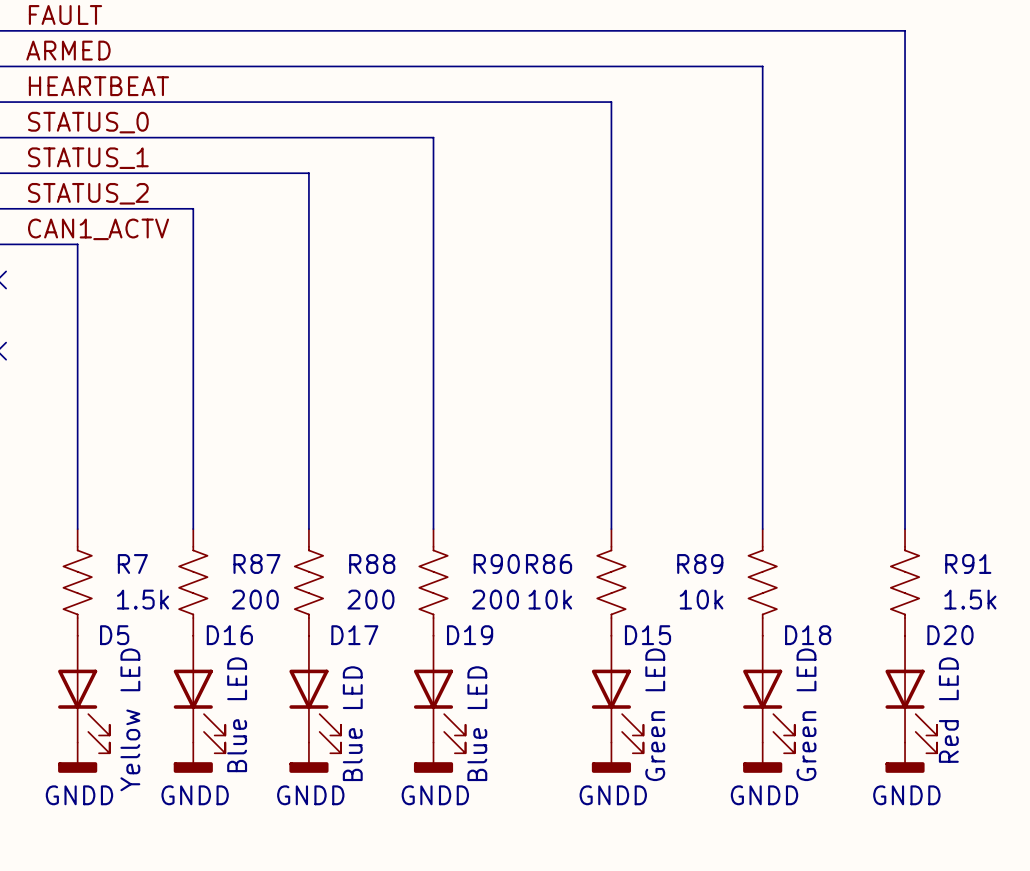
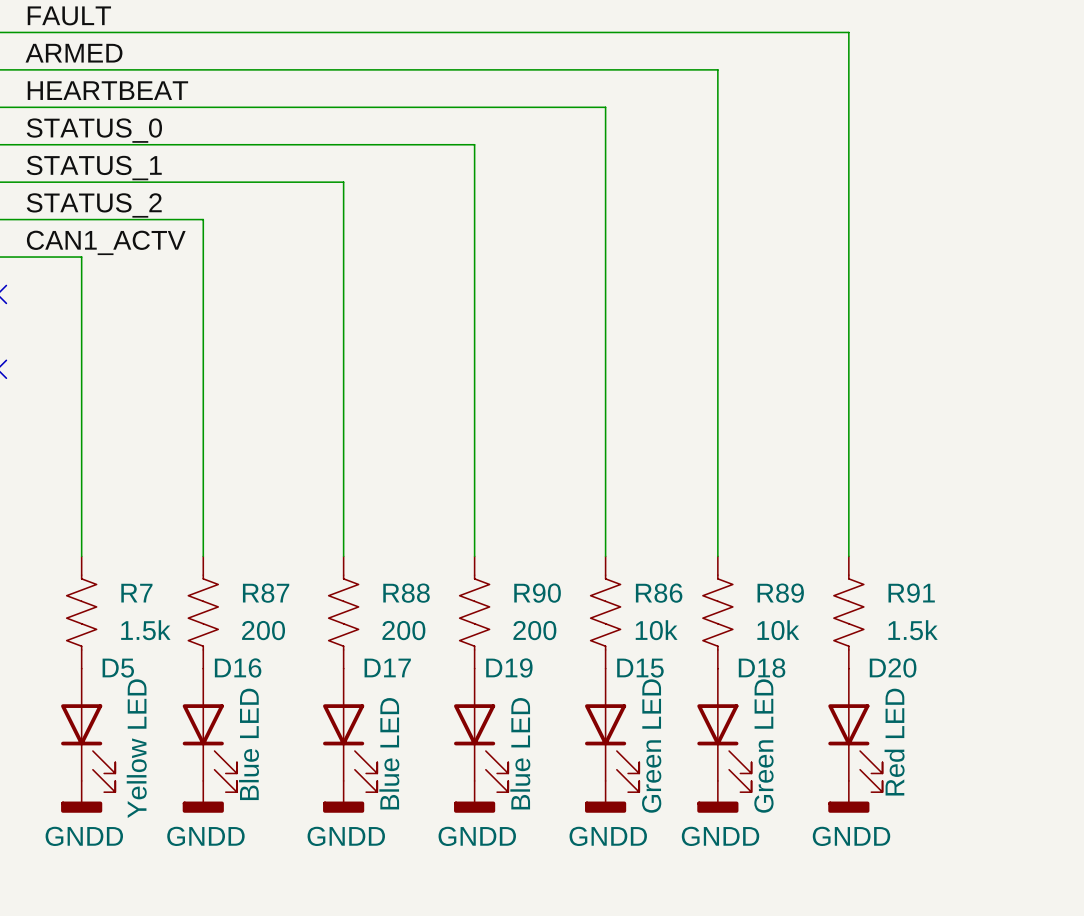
wire: (807, 30) (905, 30) (905, 529) -> (848, 32) (848, 556)
wire: (682, 66) (762, 66) (762, 529) -> (717, 69) (717, 556)
wire: (575, 102) (611, 102) (611, 529) -> (605, 107) (605, 556)
wire: (433, 137) (433, 529) -> (455, 144) (474, 144) (474, 556)
wire: (308, 173) (308, 529) -> (324, 182) (343, 182) (343, 556)
R88 position: (308, 582) -> (343, 612)
R90 position: (433, 582) -> (474, 612)
R86 flip: as is (611, 582) -> left-right (605, 612)
R89 flip: as is (762, 582) -> left-right (717, 612)
R89 position: (762, 582) -> (717, 612)
R91 position: (905, 582) -> (848, 612)
D17 position: (315, 694) -> (350, 730)
D19 position: (439, 694) -> (481, 730)
D15 position: (617, 694) -> (612, 730)
D18 position: (768, 694) -> (724, 730)
D20 position: (911, 694) -> (855, 730)
power symbol position: GNDD (308, 757) -> GNDD (343, 796)
power symbol position: GNDD (433, 757) -> GNDD (474, 796)
power symbol: none -> GNDD (605, 796)
power symbol: GNDD (611, 757) -> none
power symbol: none -> GNDD (717, 796)
power symbol: GNDD (762, 757) -> none
power symbol: none -> GNDD (848, 796)
power symbol: GNDD (905, 757) -> none

